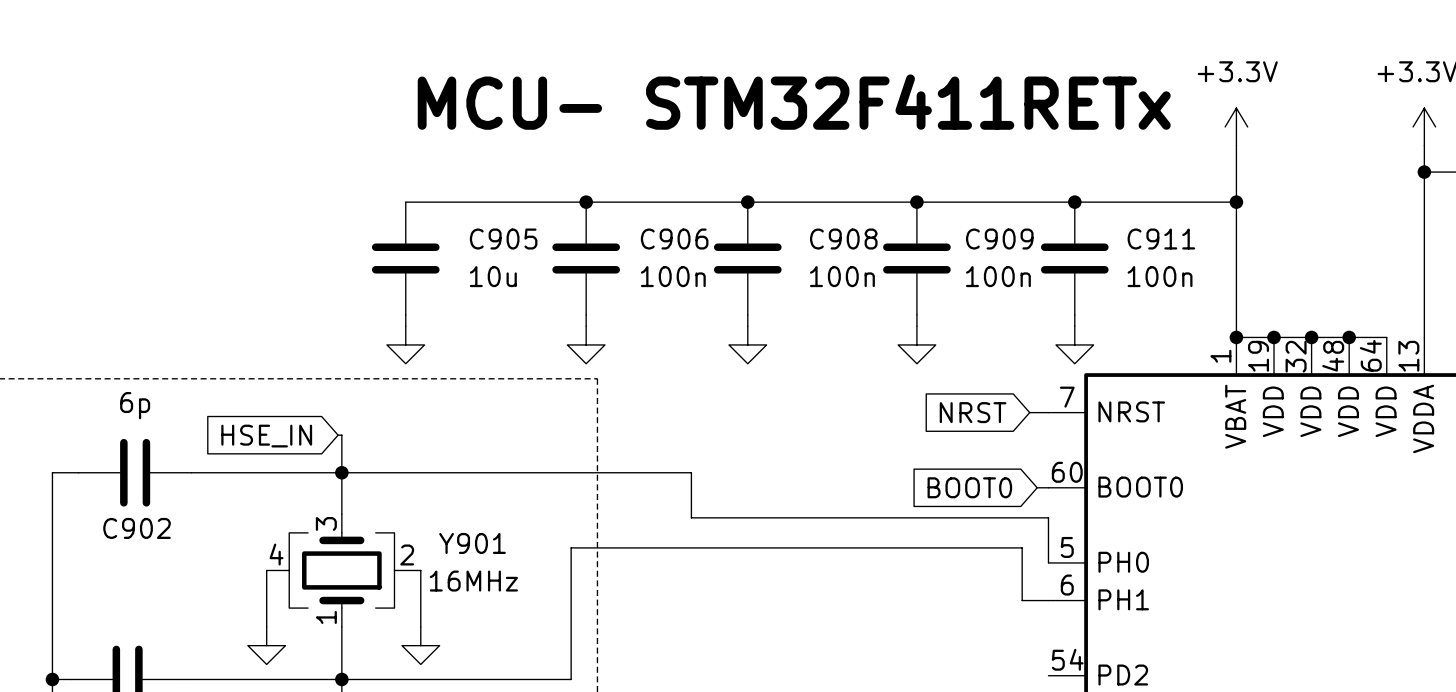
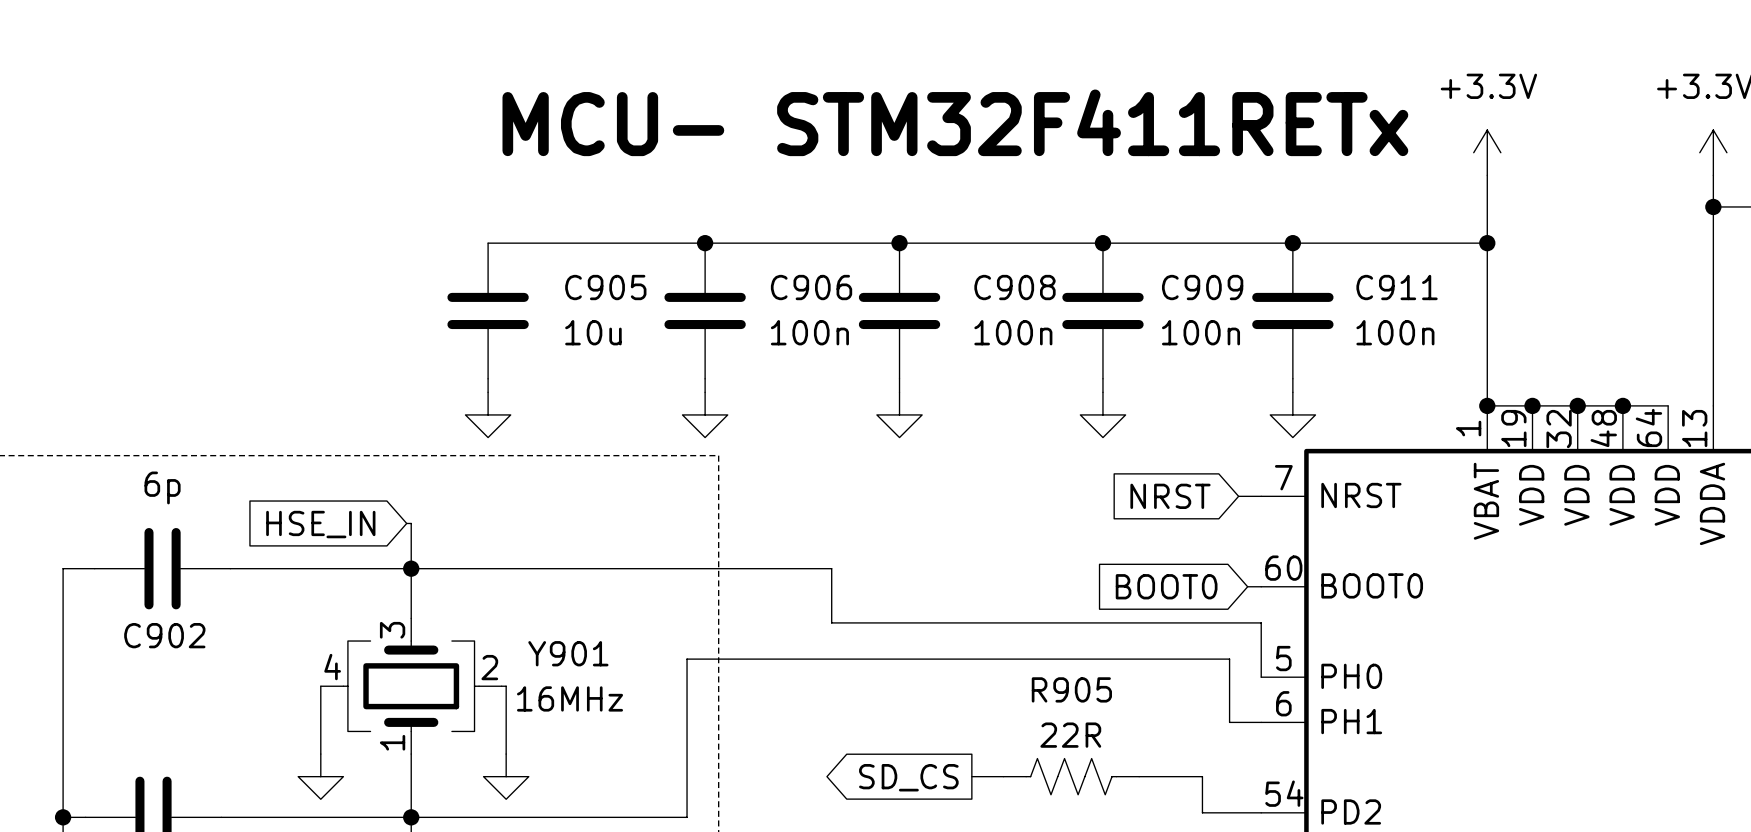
wire: none -> (971, 776) (1003, 776)
R905: none -> 22R (1071, 776)
wire: none -> (1139, 776) (1202, 776) (1202, 812) (1261, 812)
global label: none -> SD_CS (908, 777)

